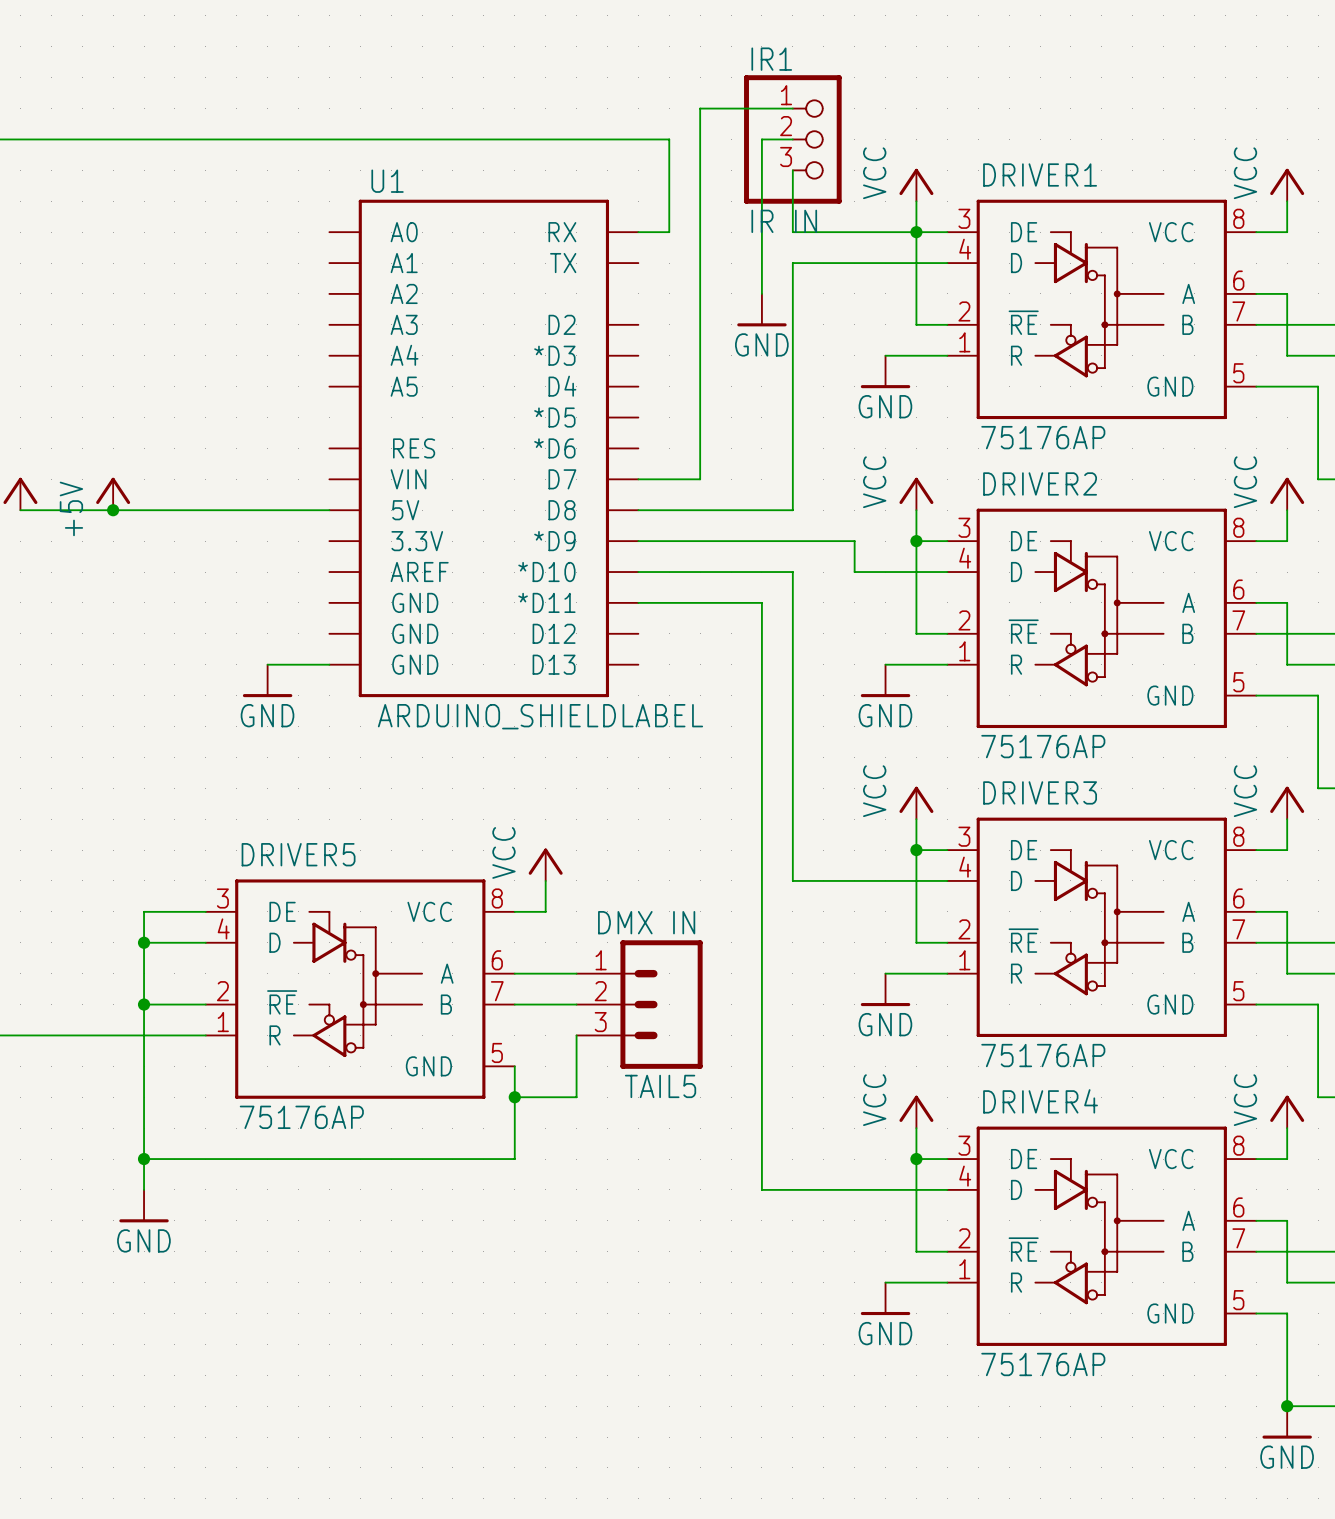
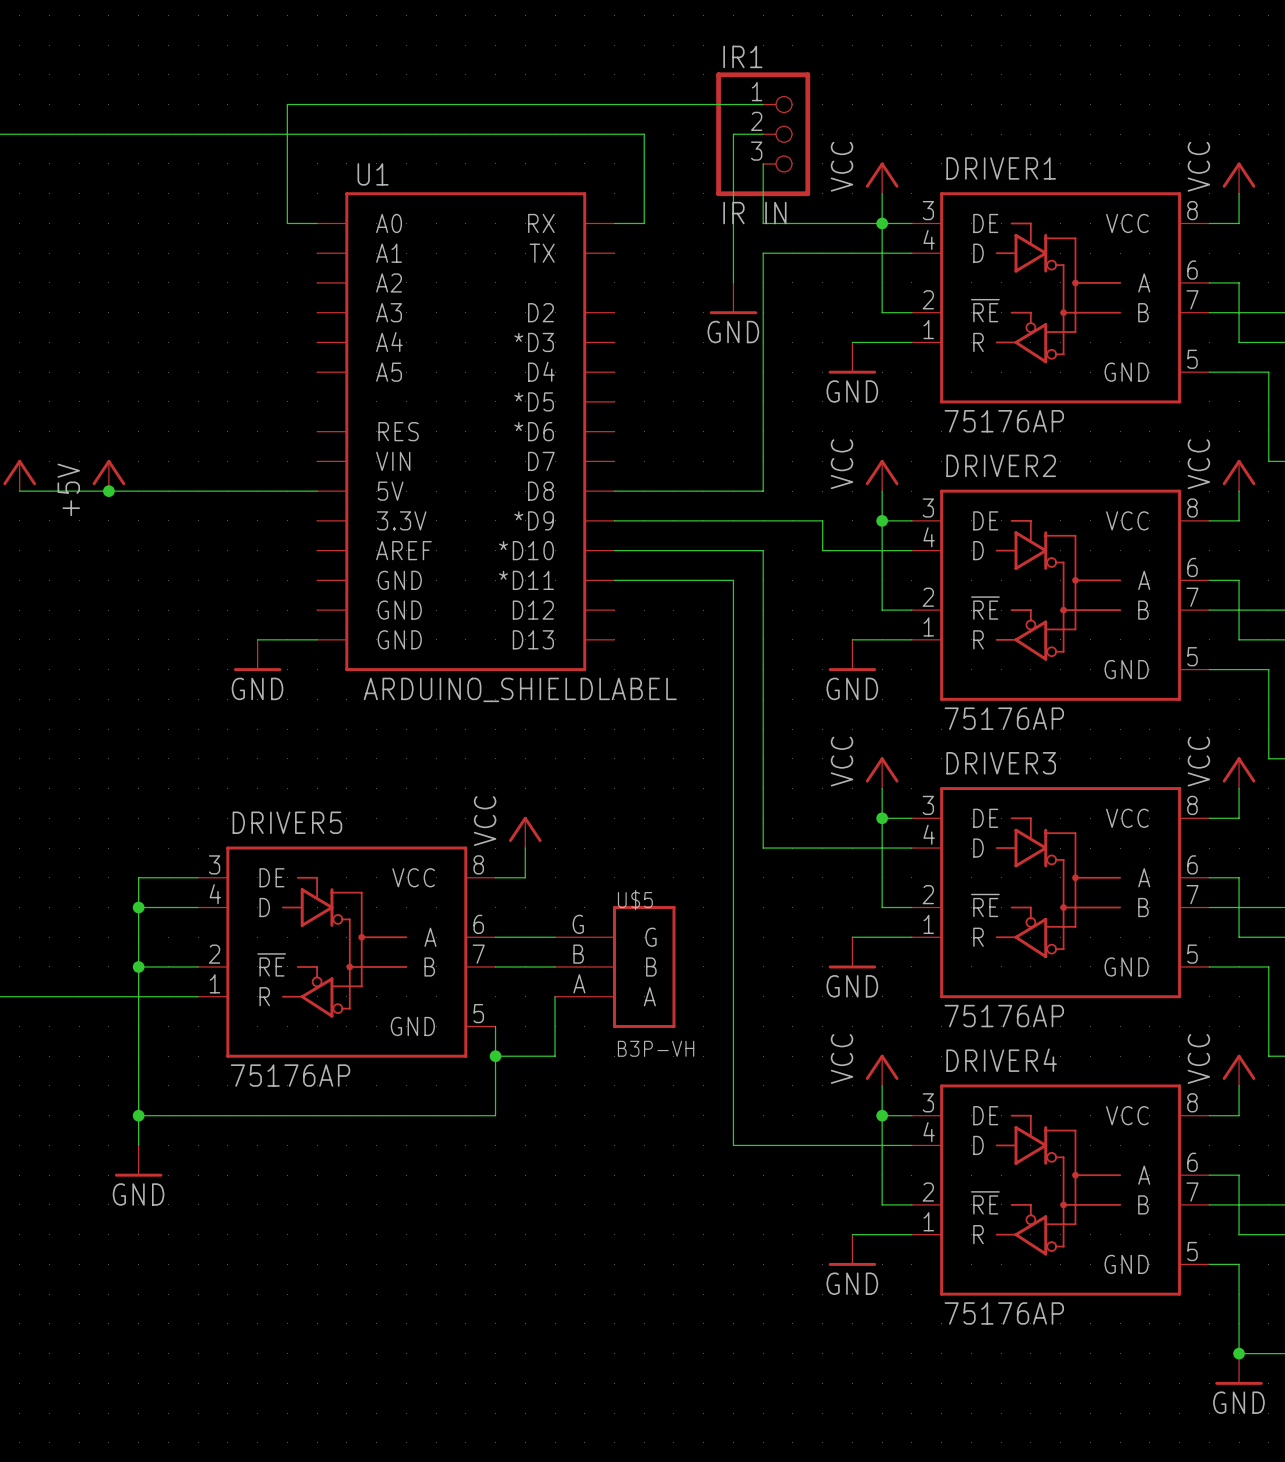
wire: (700, 108) (700, 479) (638, 479) -> (673, 104) (287, 104) (287, 223) (317, 223)
TAIL5: DMX IN (639, 1004) -> none
U$5: none -> B3P-VH (615, 966)

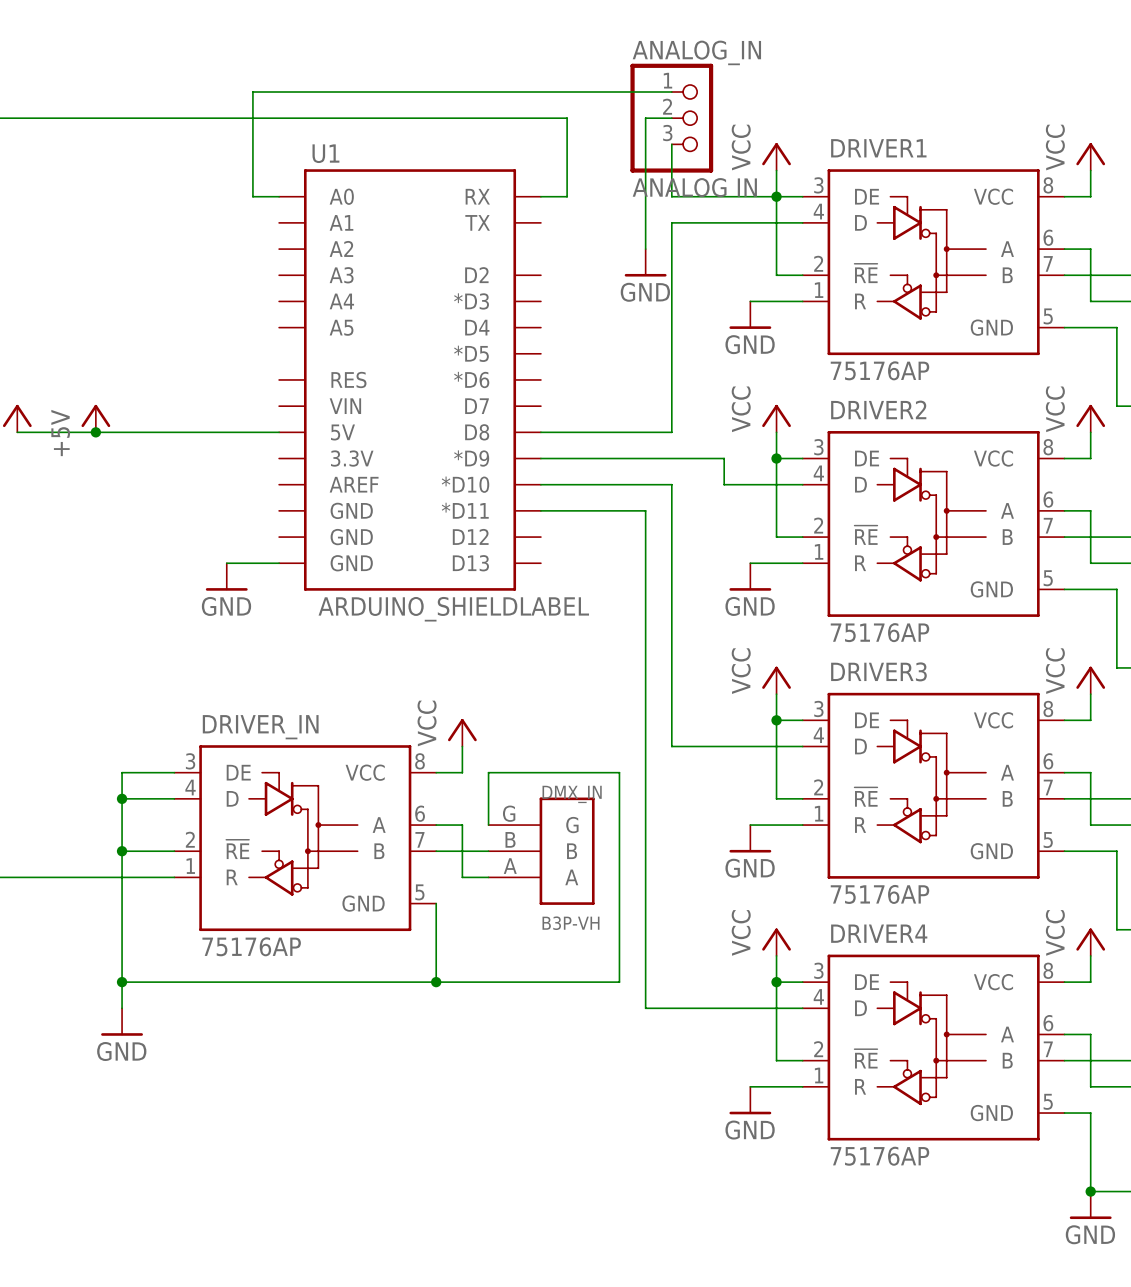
IR1 name: IR1 (742, 56) -> ANALOG_IN (696, 52)
IR1 value: IR IN (754, 213) -> ANALOG IN (694, 187)
DRIVER5 name: DRIVER5 (287, 822) -> DRIVER_IN (260, 727)
U$5 name: U$5 (635, 900) -> DMX_IN (572, 794)
wire: (525, 937) (555, 937) -> (462, 825) (462, 877) (488, 877)
wire: none -> (488, 825) (488, 772) (619, 772) (619, 982) (436, 982)
wire: (555, 996) (555, 1056) (495, 1056) -> none
junction position: (495, 1056) -> (436, 982)

